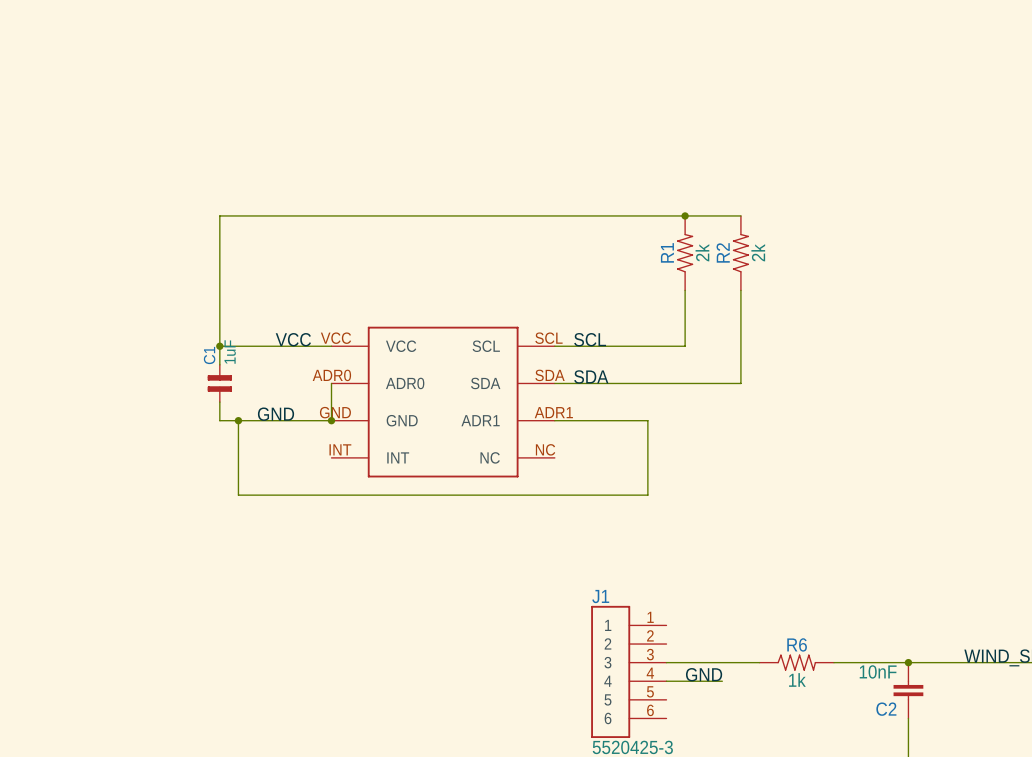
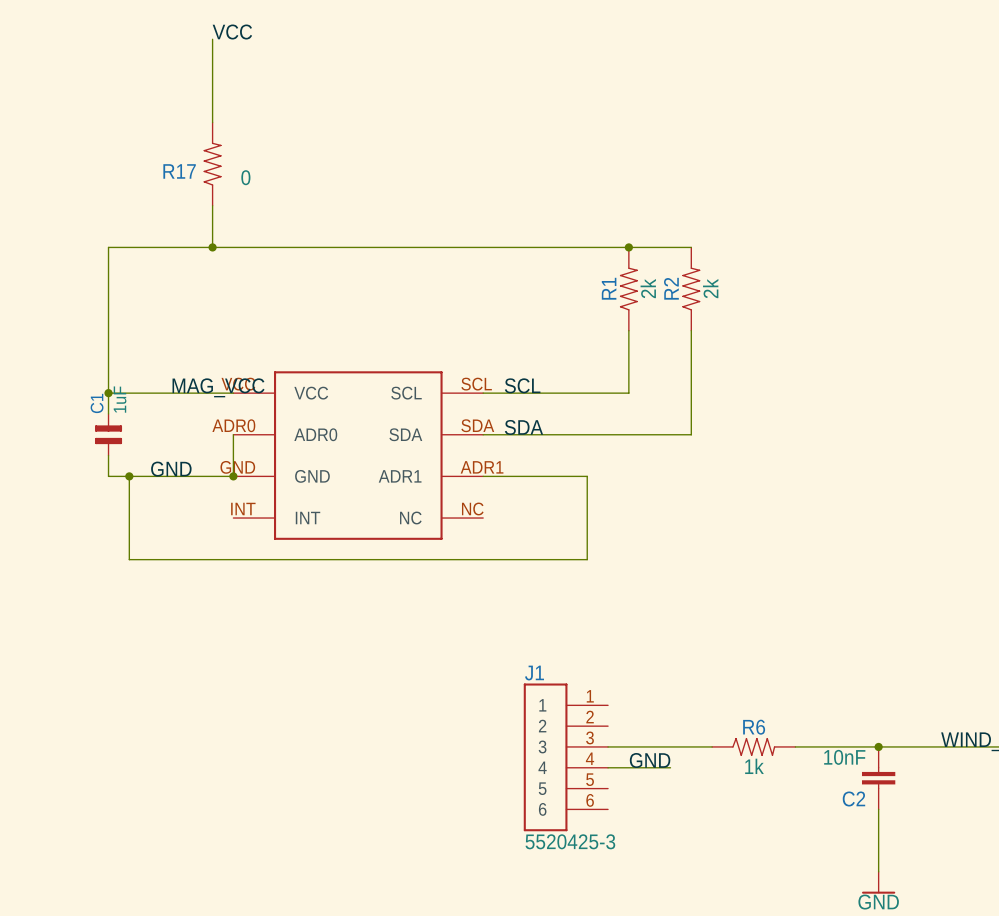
label: none -> VCC (232, 32)
wire: none -> (212, 39) (212, 122)
R17: none -> 0 (212, 164)
wire: none -> (212, 205) (212, 247)
junction: none -> (212, 247)
label: VCC (293, 339) -> MAG_VCC (218, 387)

